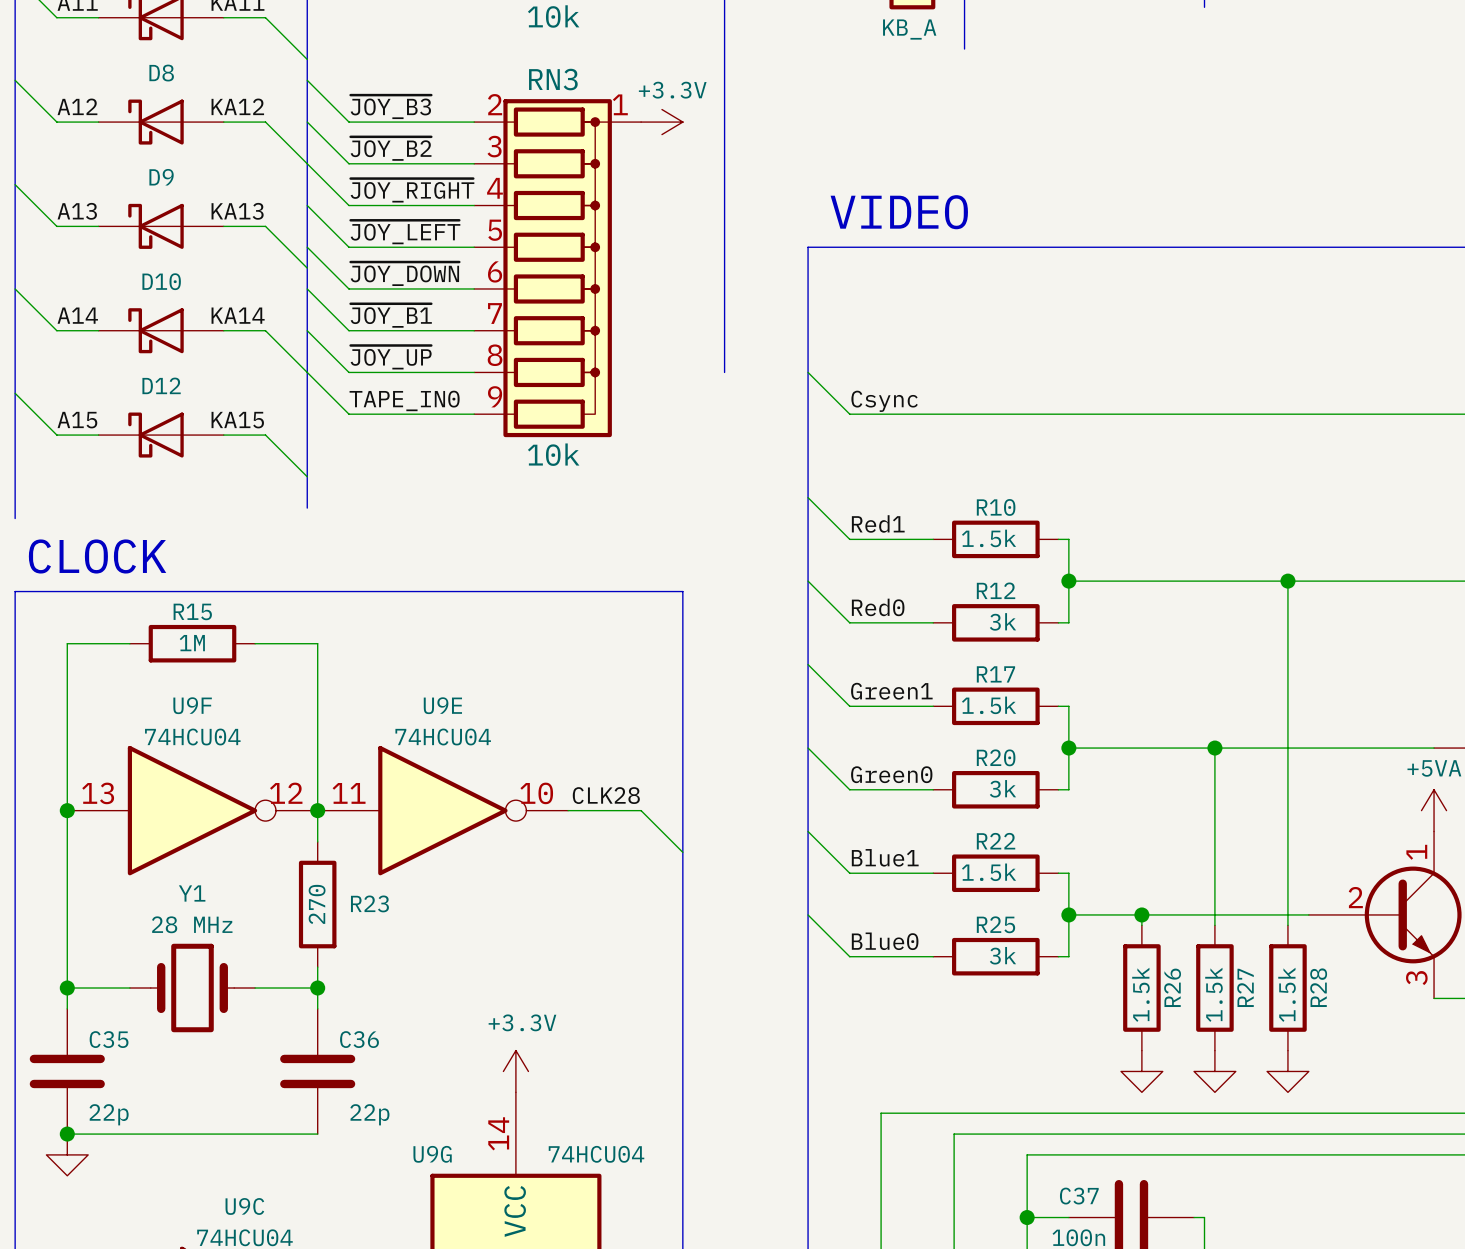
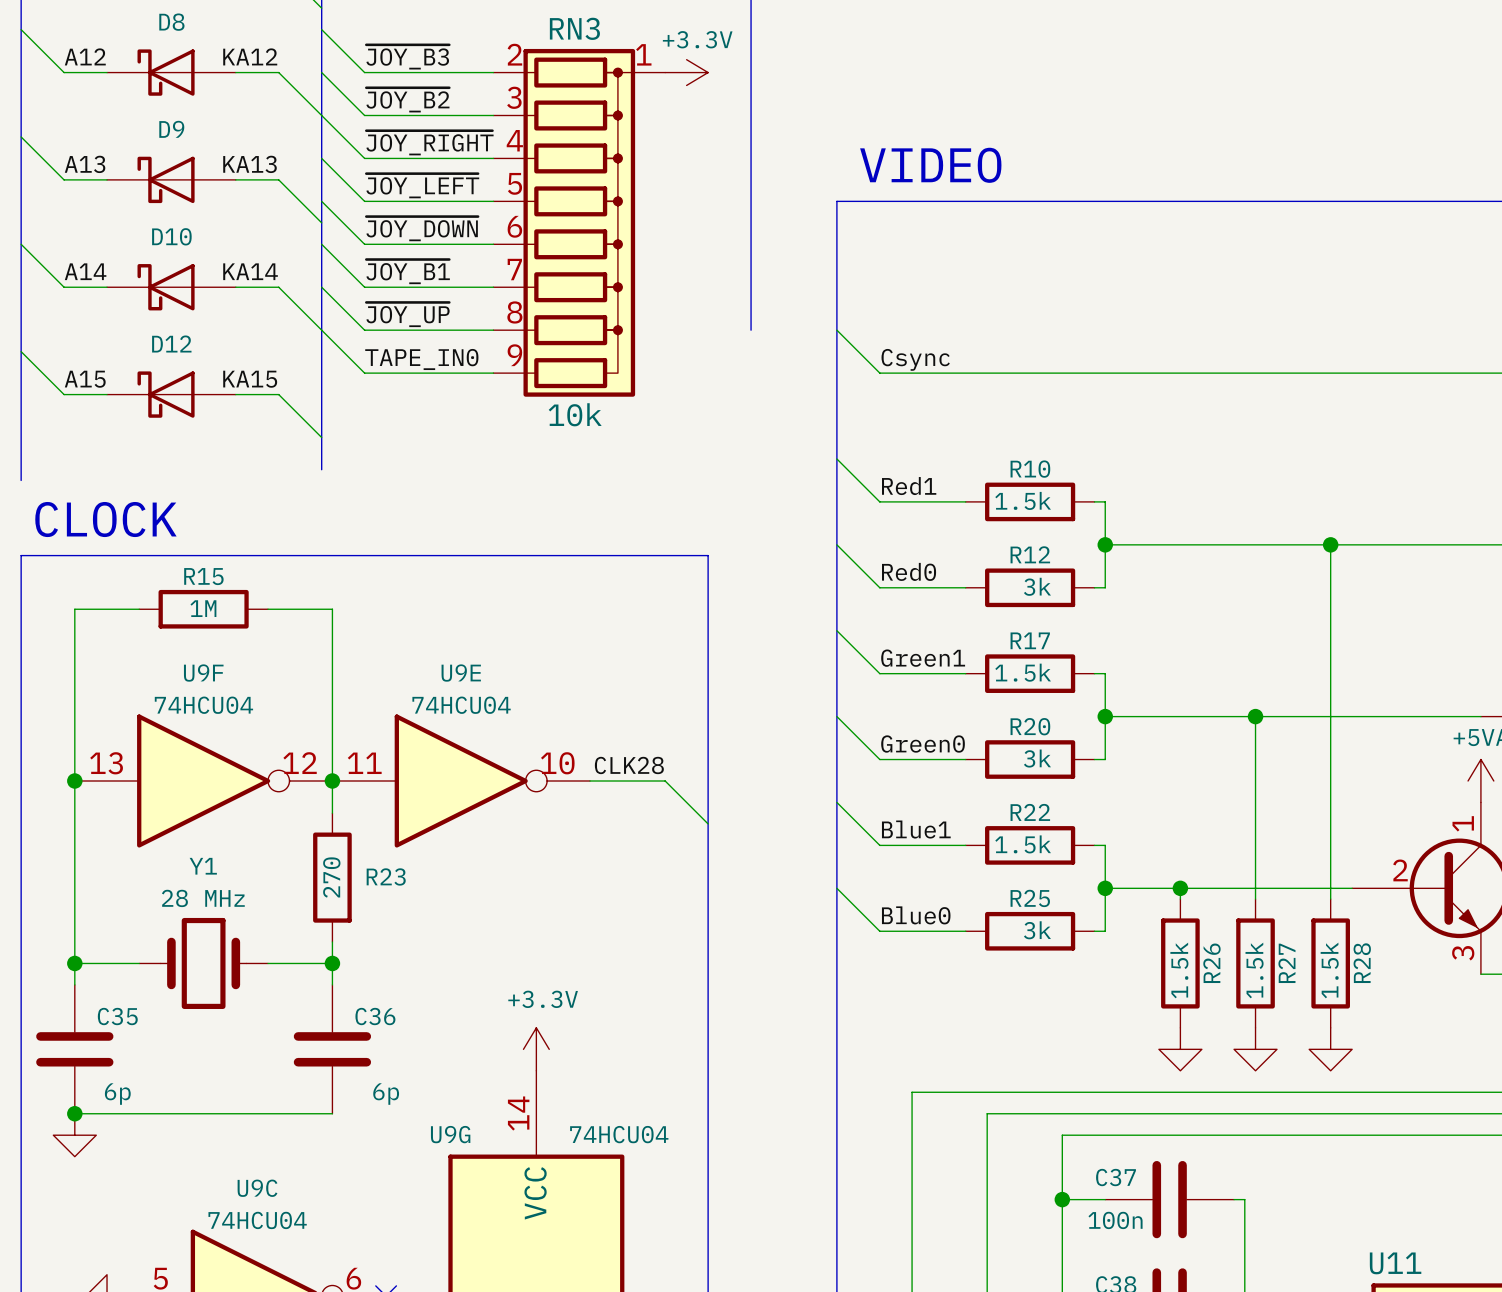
C35 value: 22p (109, 1114) -> 6p (117, 1094)
C36 value: 22p (369, 1114) -> 6p (386, 1094)

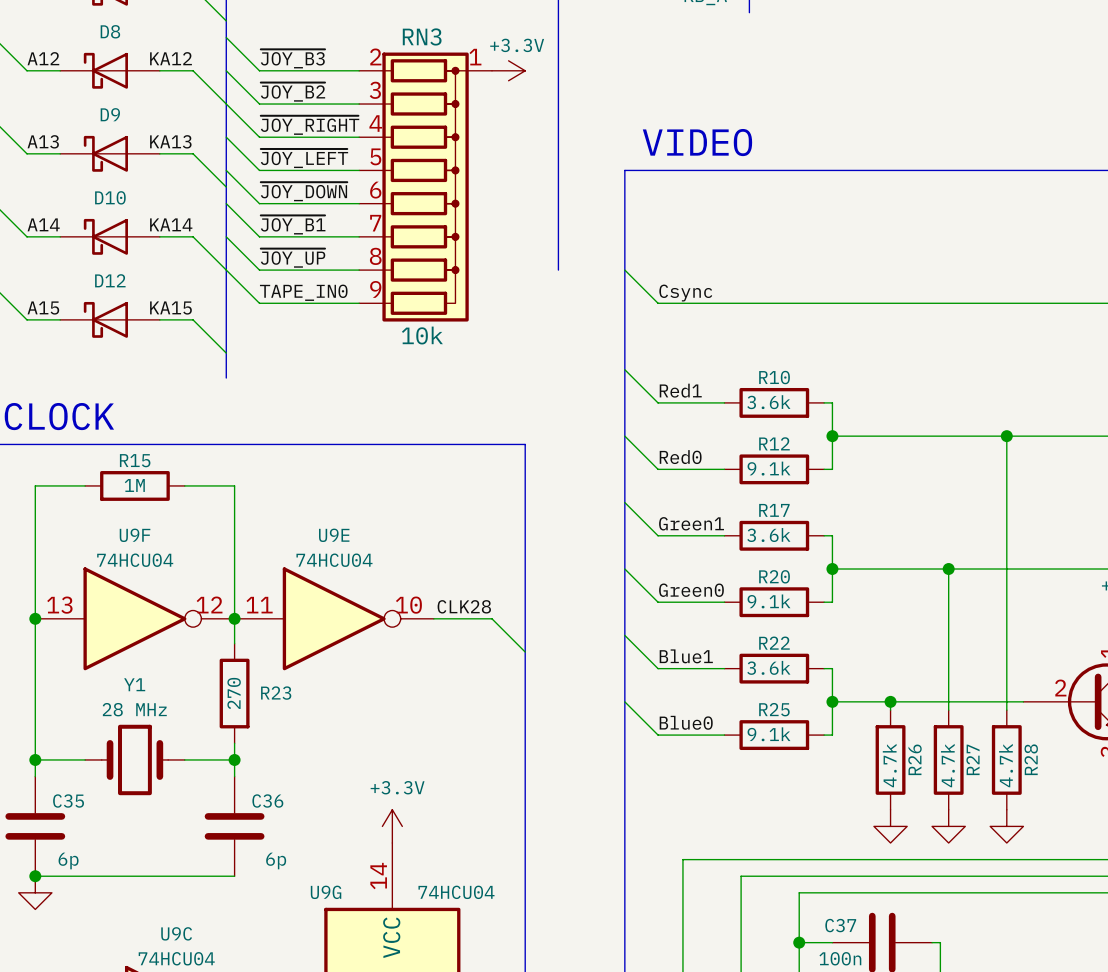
R10 value: 1.5k (1023, 500) -> 3.6k (768, 402)
R12 value: 3k (1037, 586) -> 9.1k (769, 468)
R17 value: 1.5k (1023, 672) -> 3.6k (768, 535)
R20 value: 3k (1037, 758) -> 9.1k (769, 601)
R22 value: 1.5k (1023, 844) -> 3.6k (768, 667)
R25 value: 3k (1037, 930) -> 9.1k (769, 734)
R26 value: 1.5k (1179, 970) -> 4.7k (889, 765)
R27 value: 1.5k (1254, 970) -> 4.7k (947, 765)
R28 value: 1.5k (1329, 970) -> 4.7k (1006, 765)

